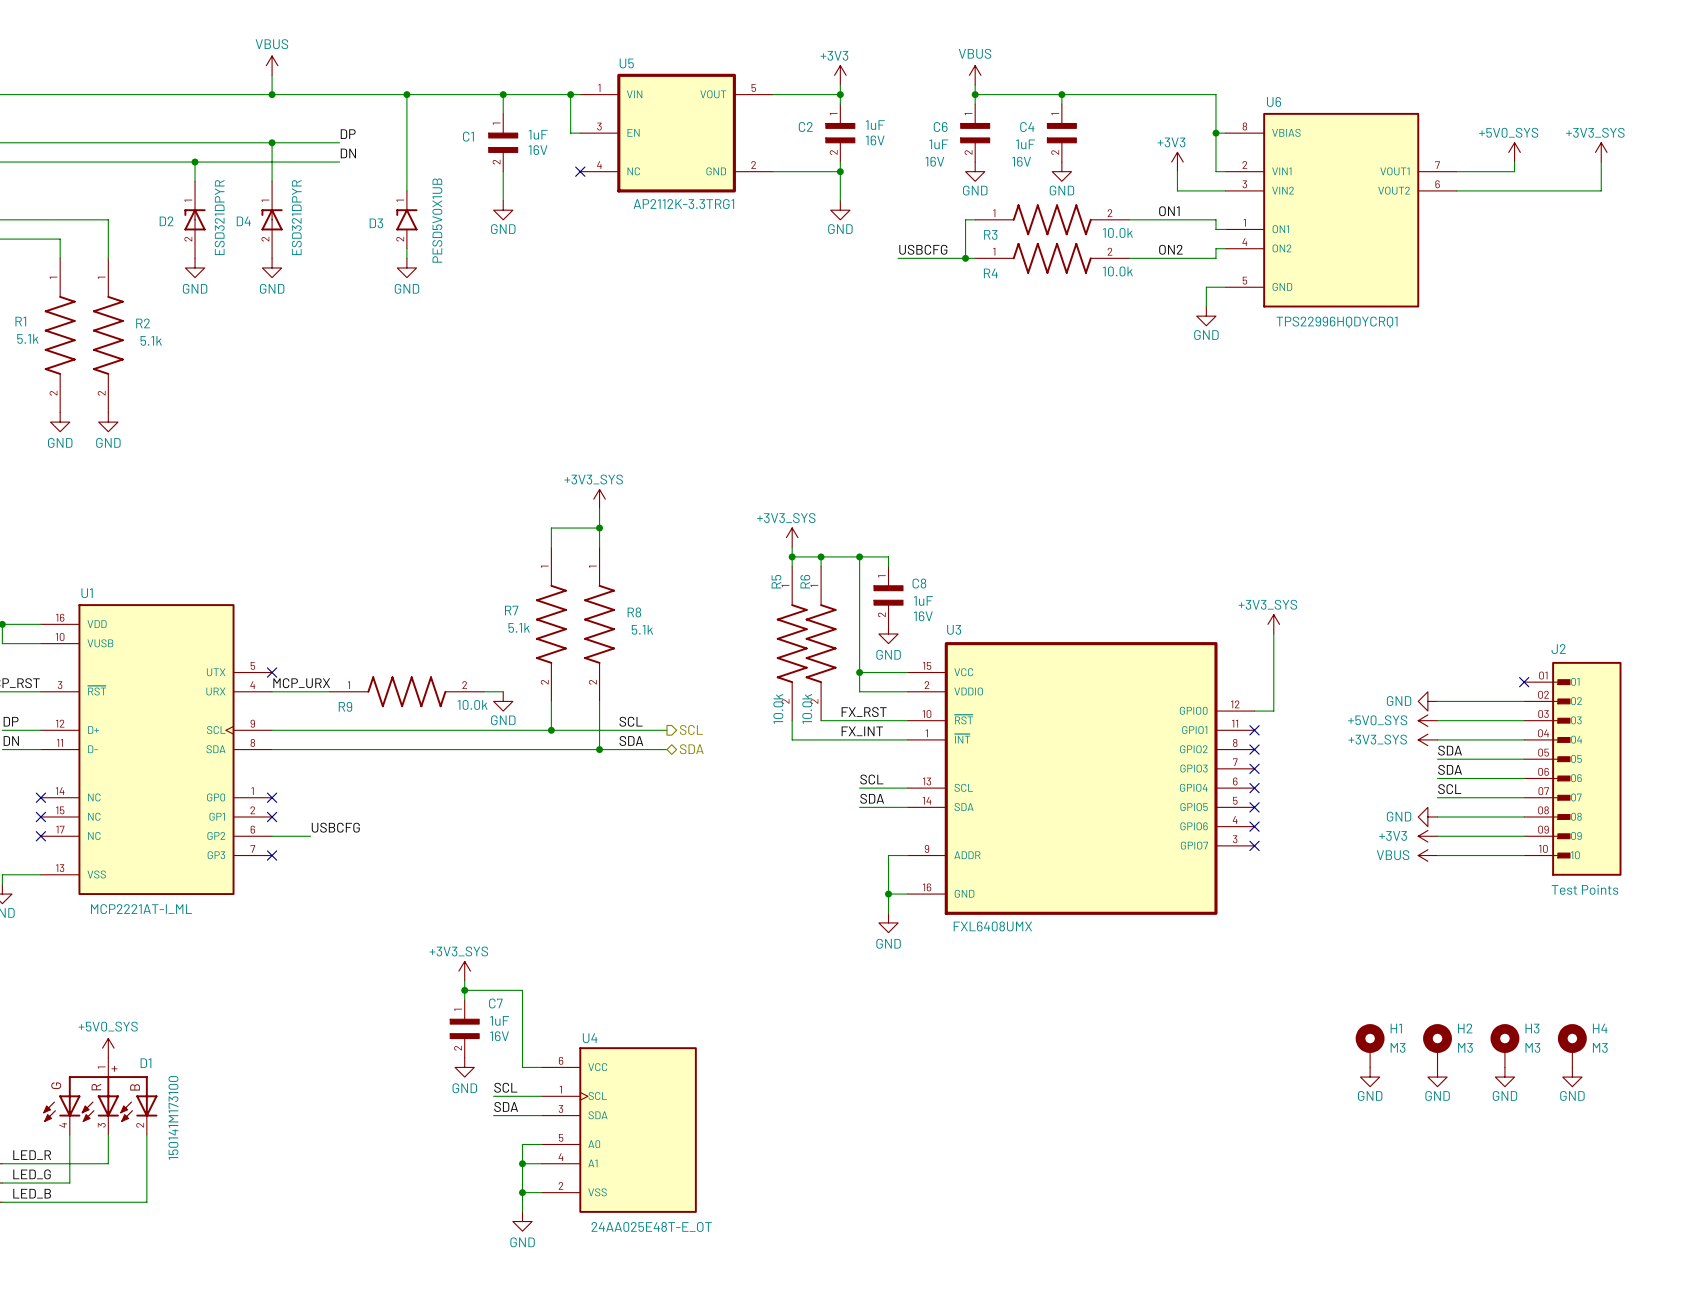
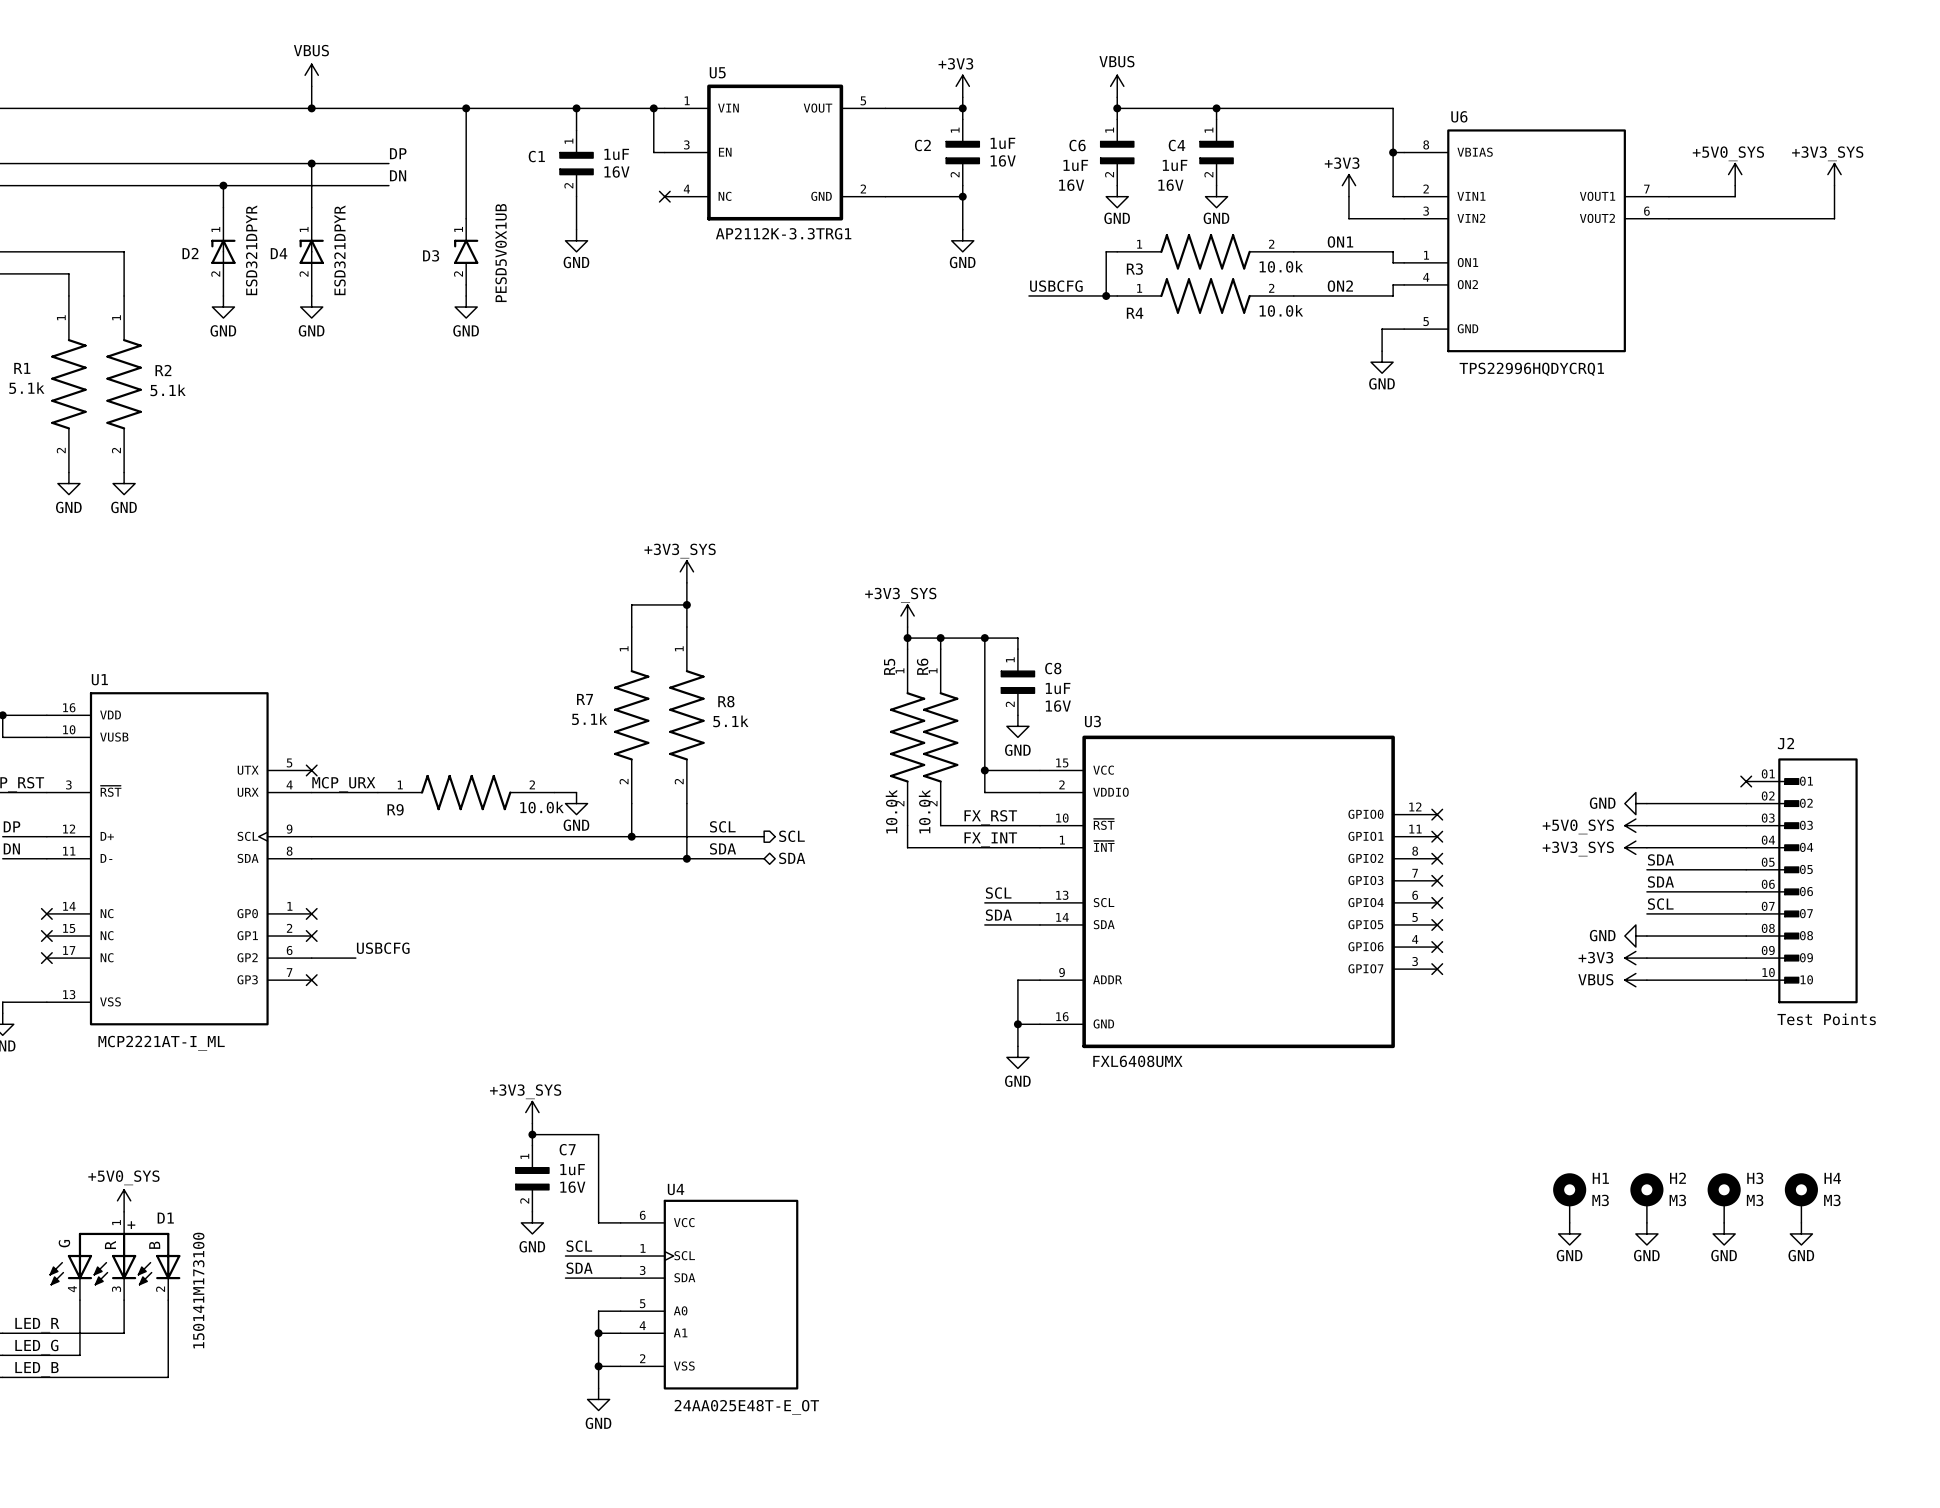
power symbol: +3V3_SYS (1273, 624) -> none
wire: (1273, 633) (1273, 711) (1254, 711) -> none
no-connect mark: none -> (1437, 814)

